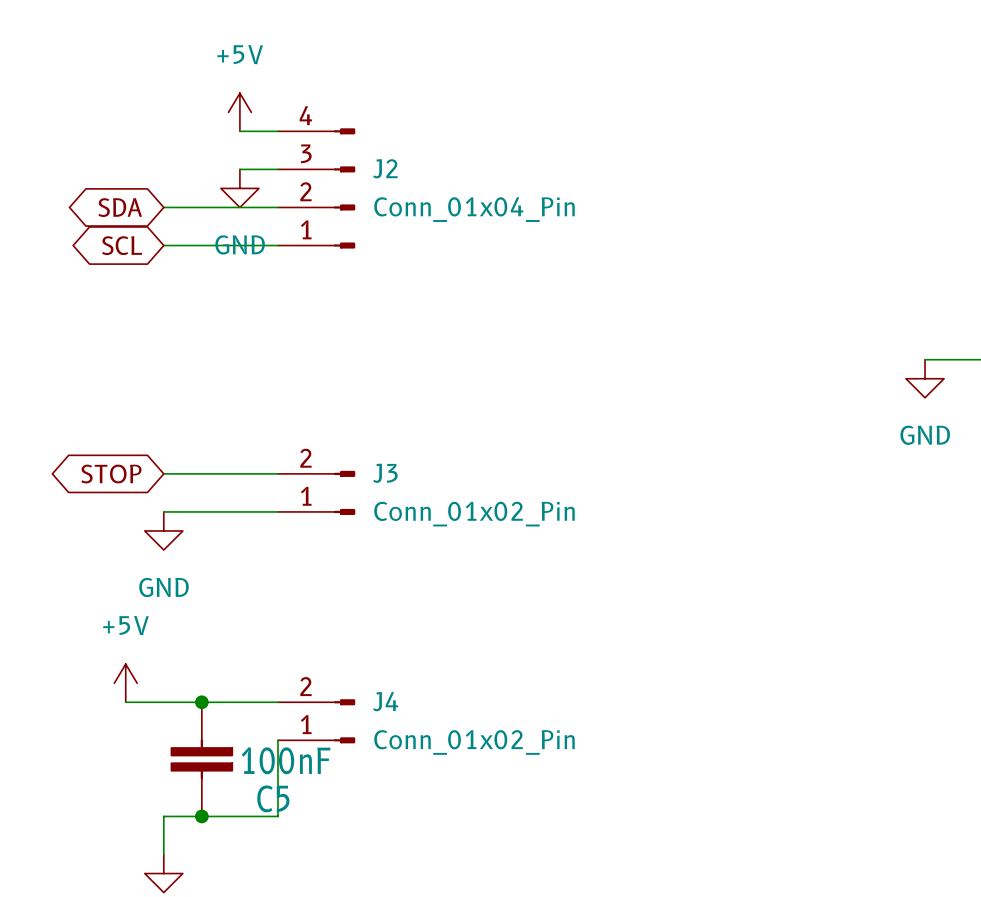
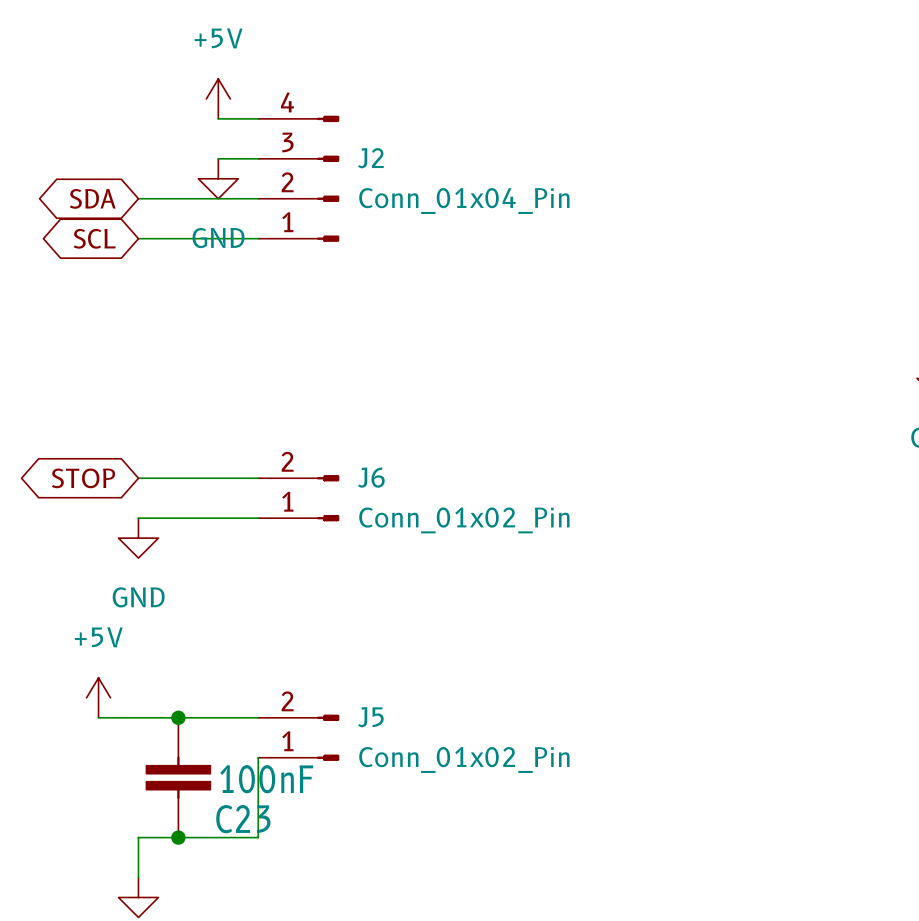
J3 name: J3 (385, 473) -> J6 (371, 477)
J4 name: J4 (385, 701) -> J5 (370, 717)
C5 name: C5 (273, 798) -> C23 (243, 819)

